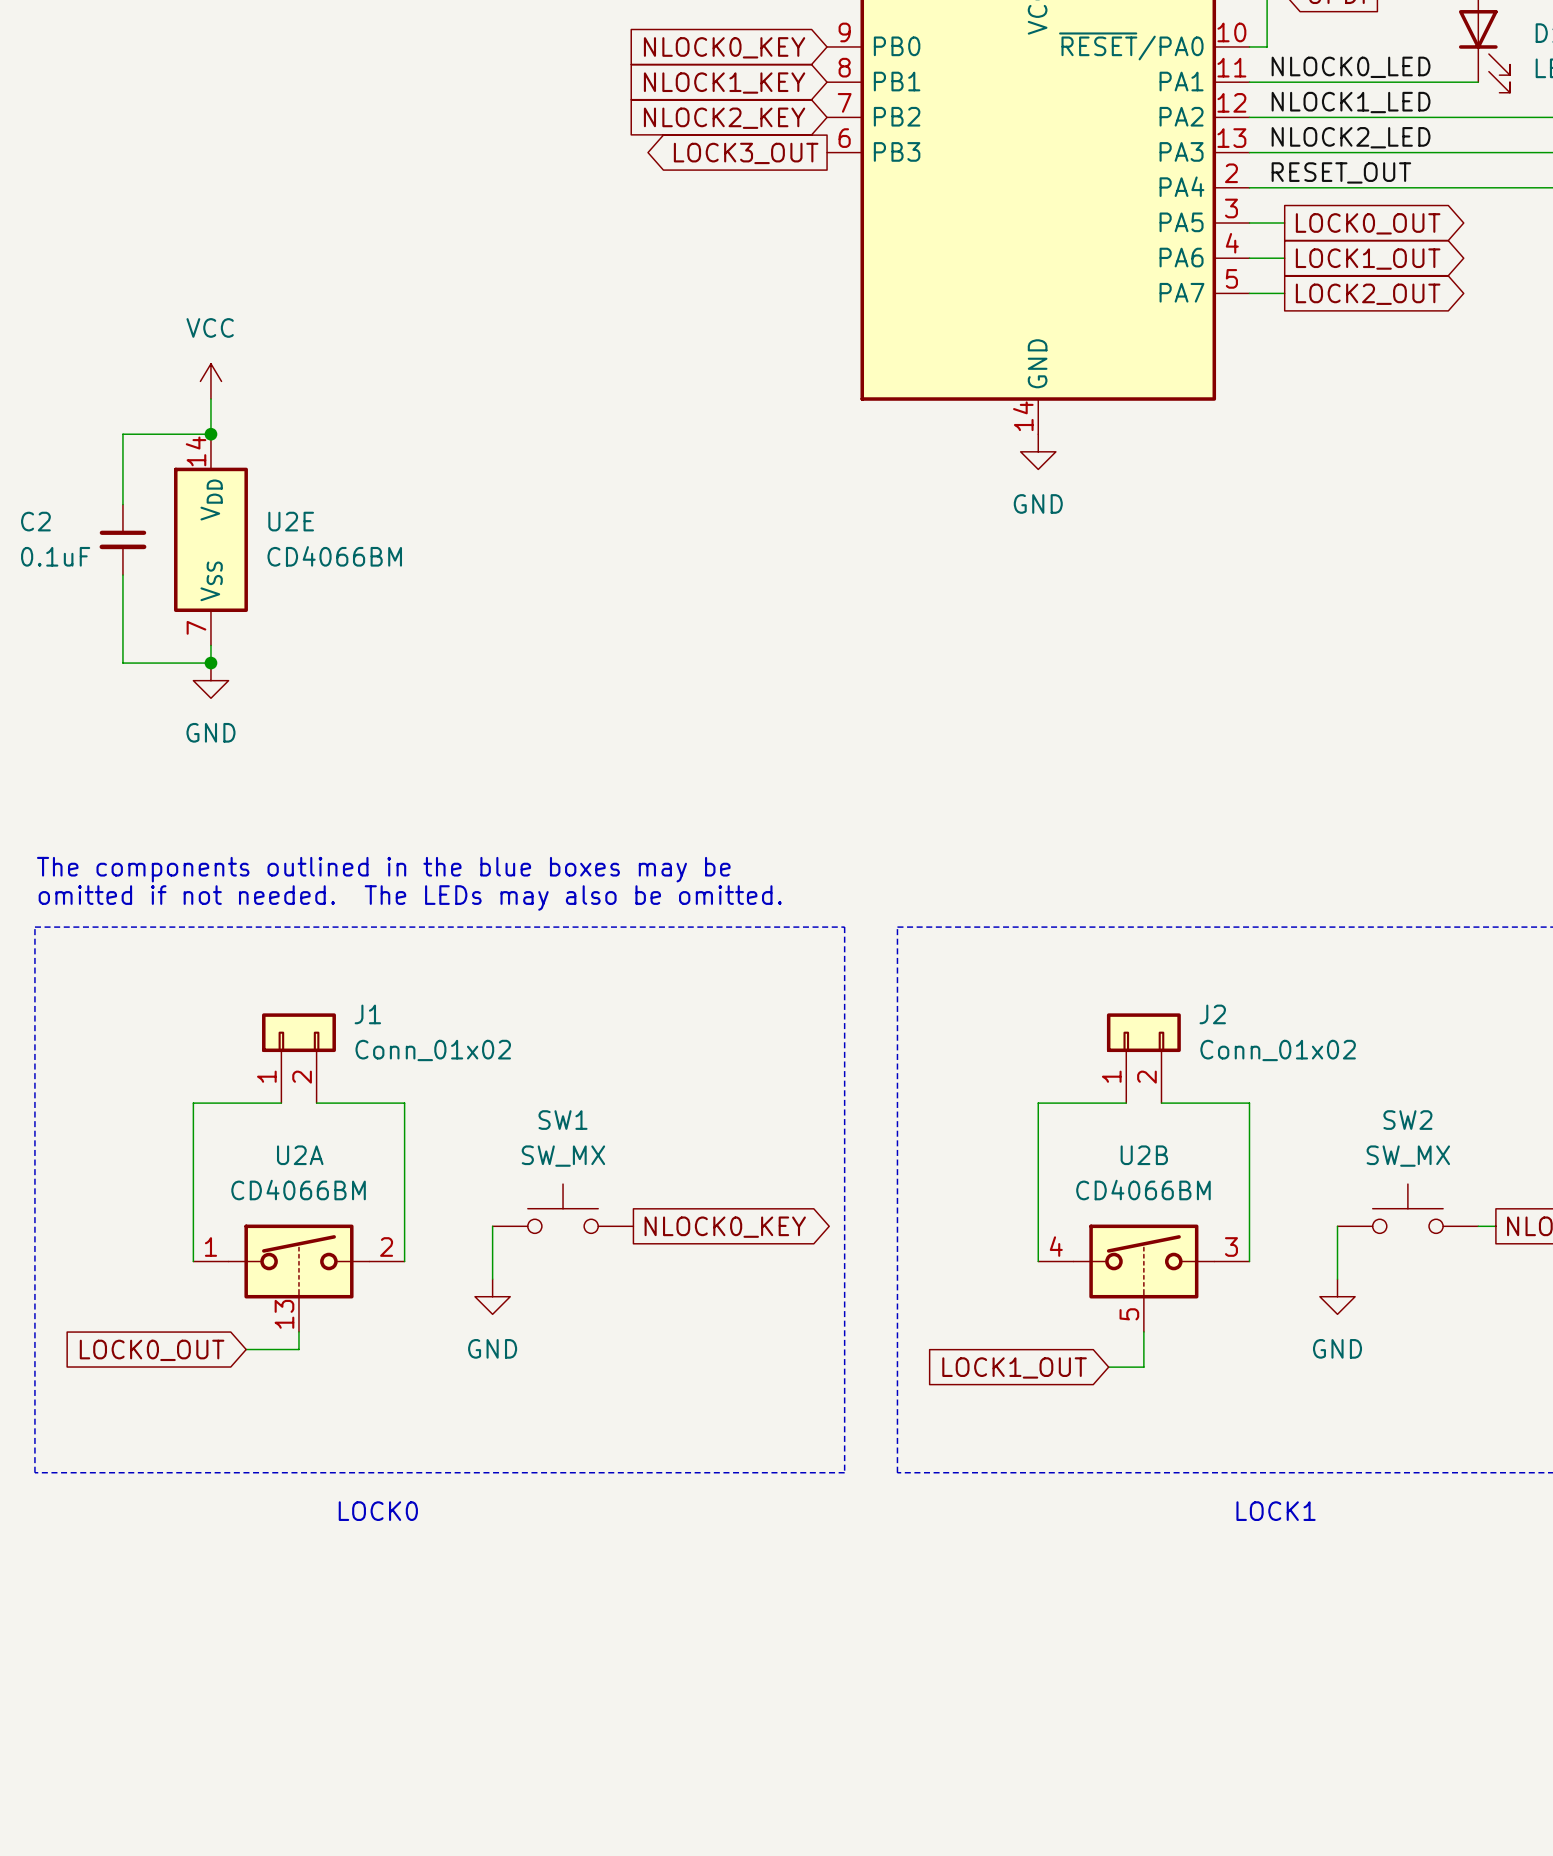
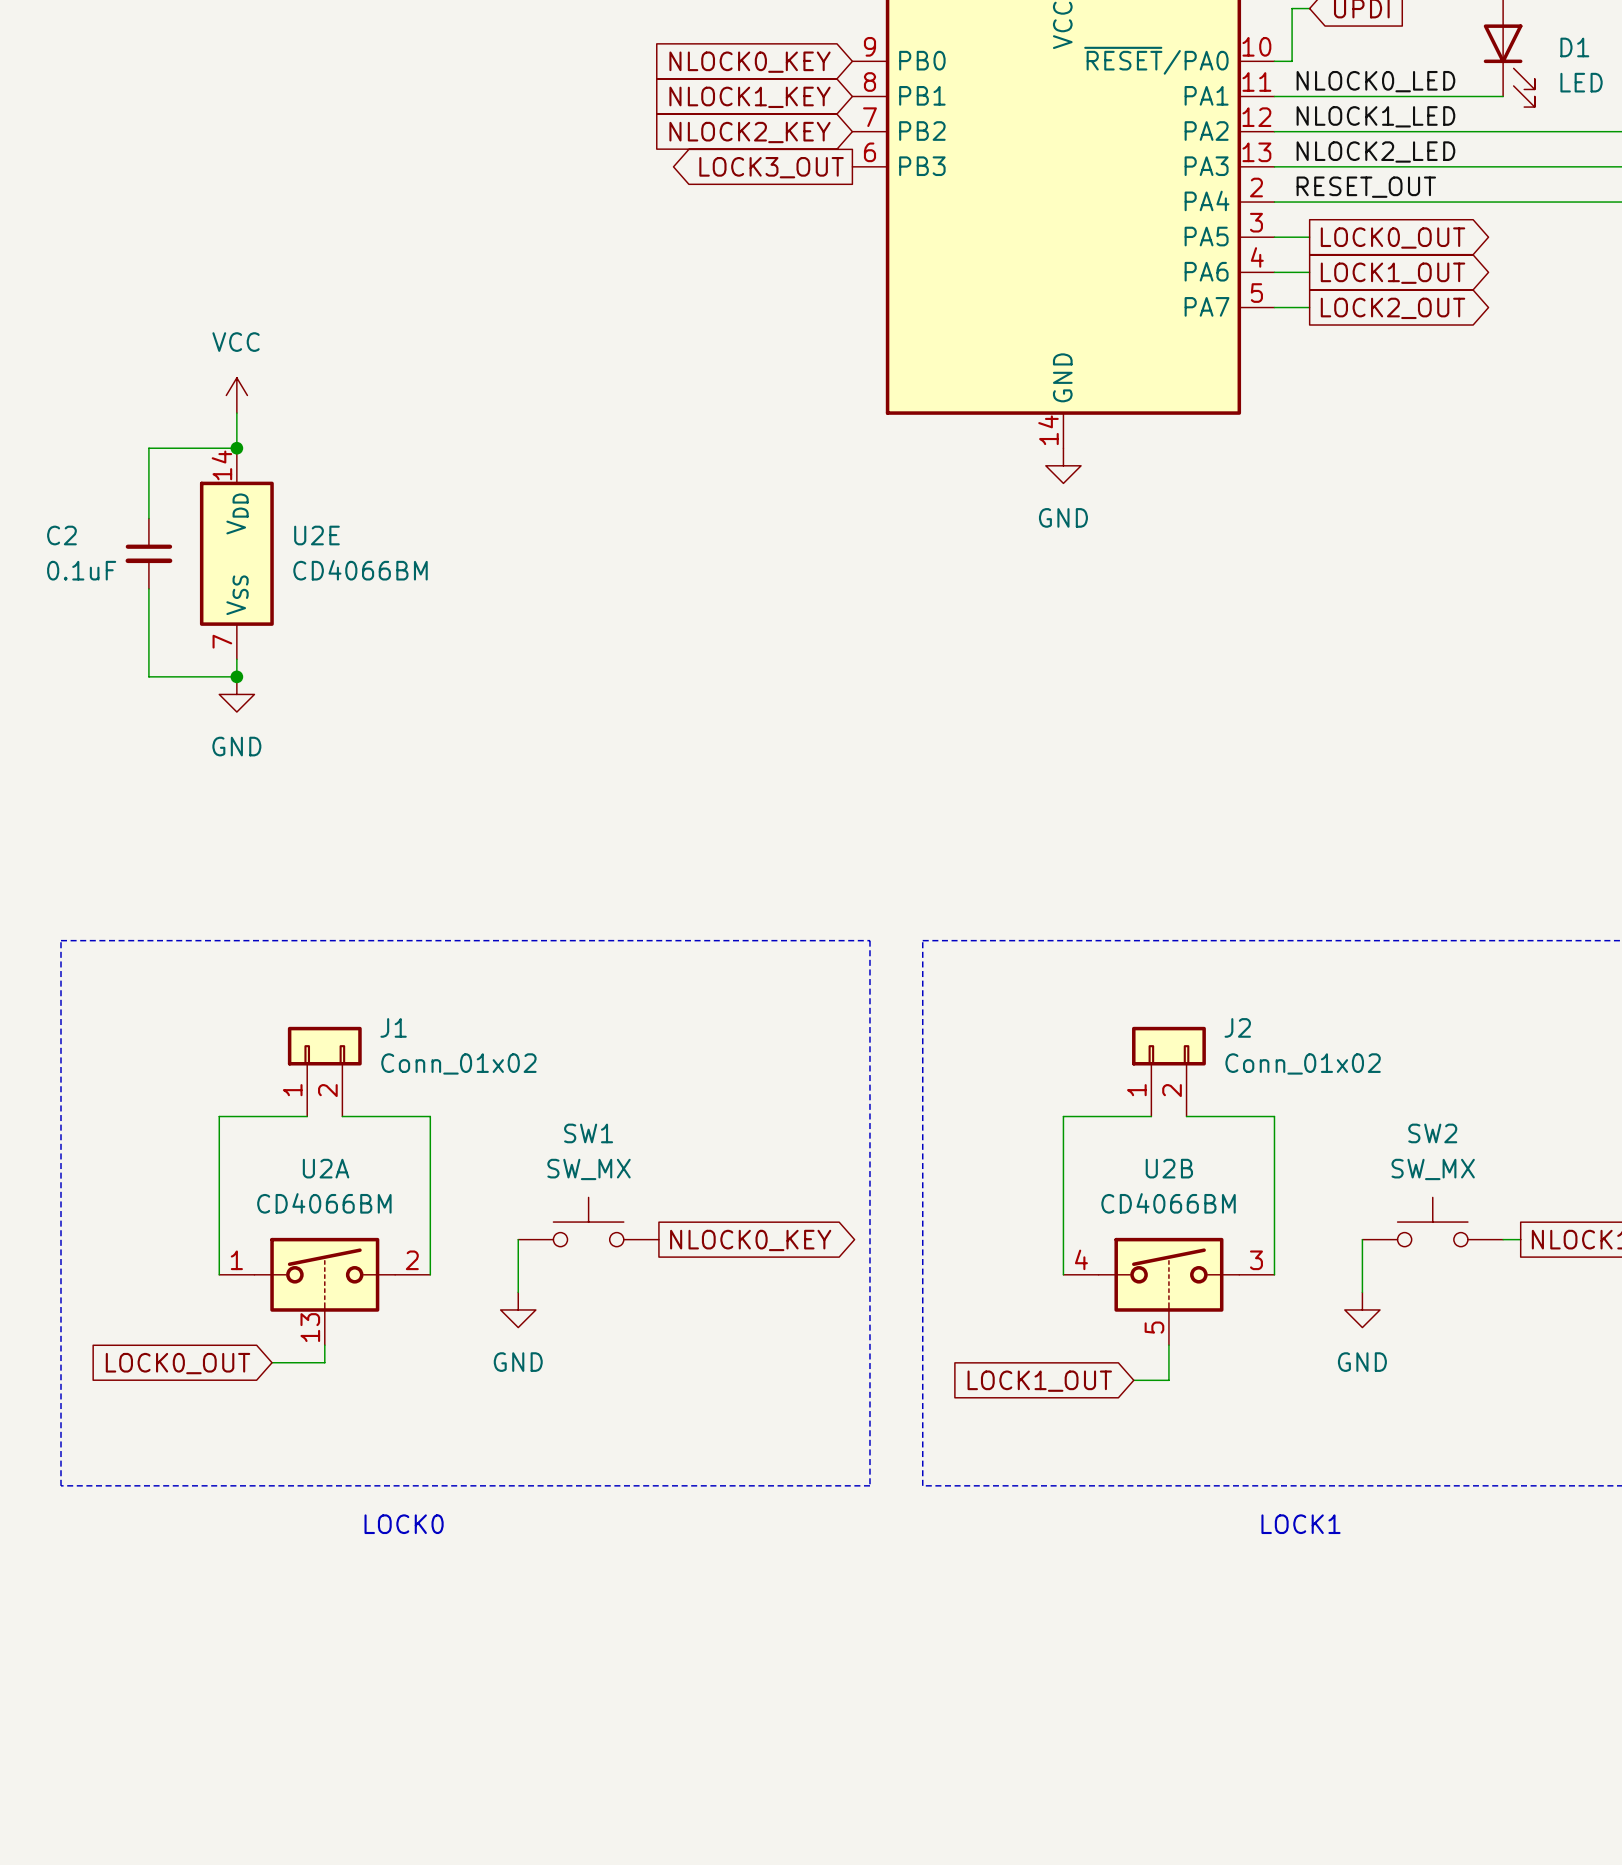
text: The components outlined in the blue boxes may be (383, 869) -> none
text: omitted if not needed. The LEDs may also be omitted. (410, 897) -> none

